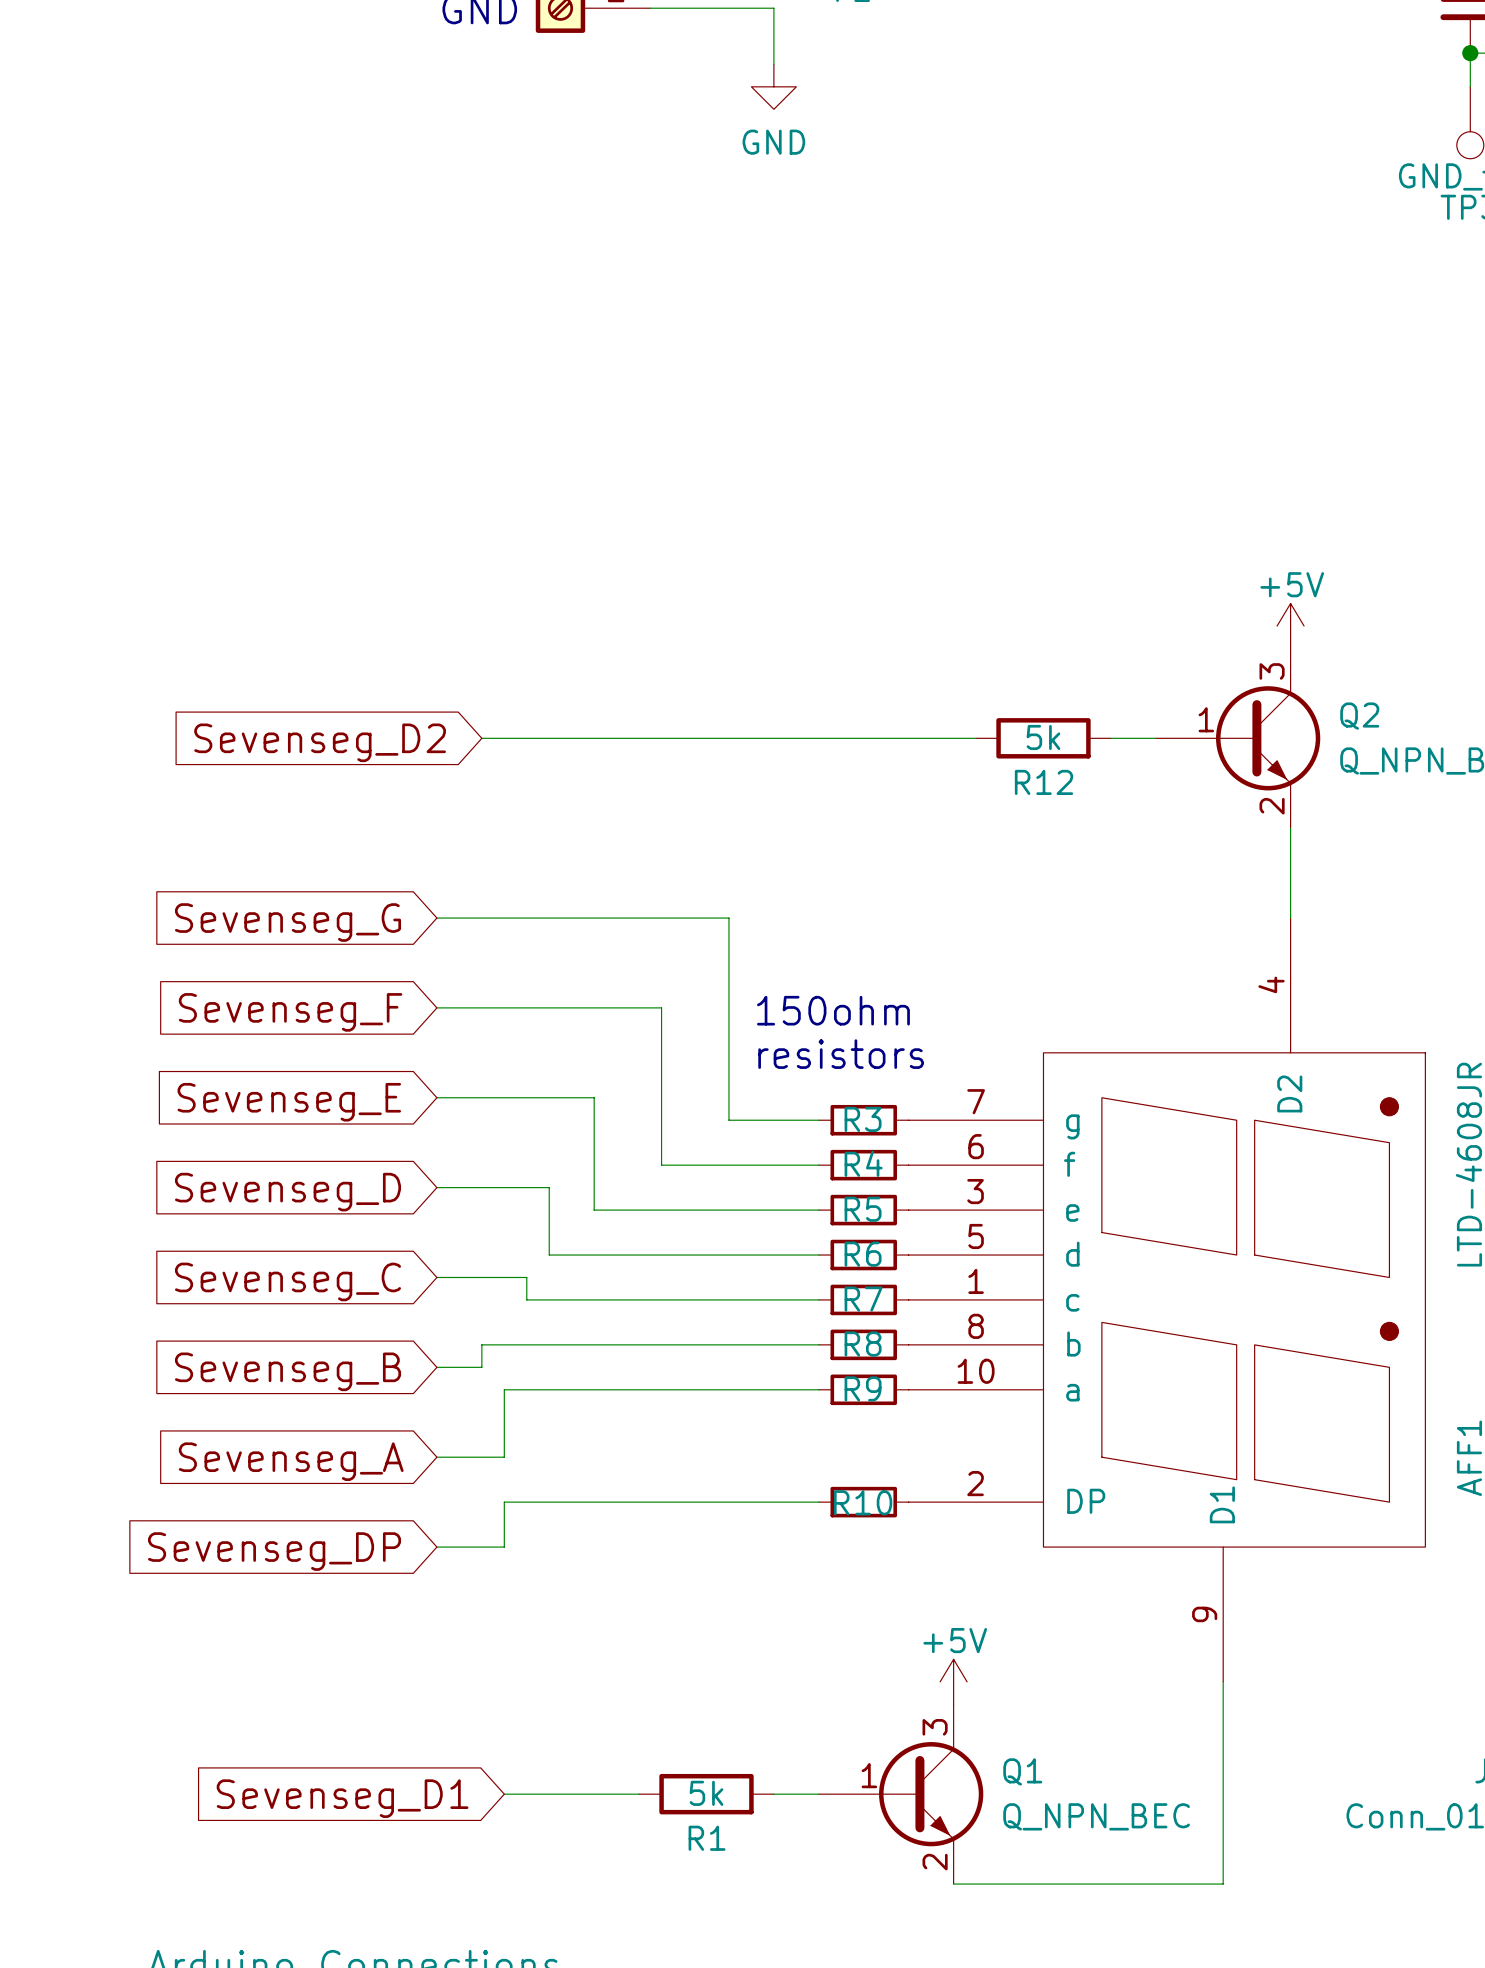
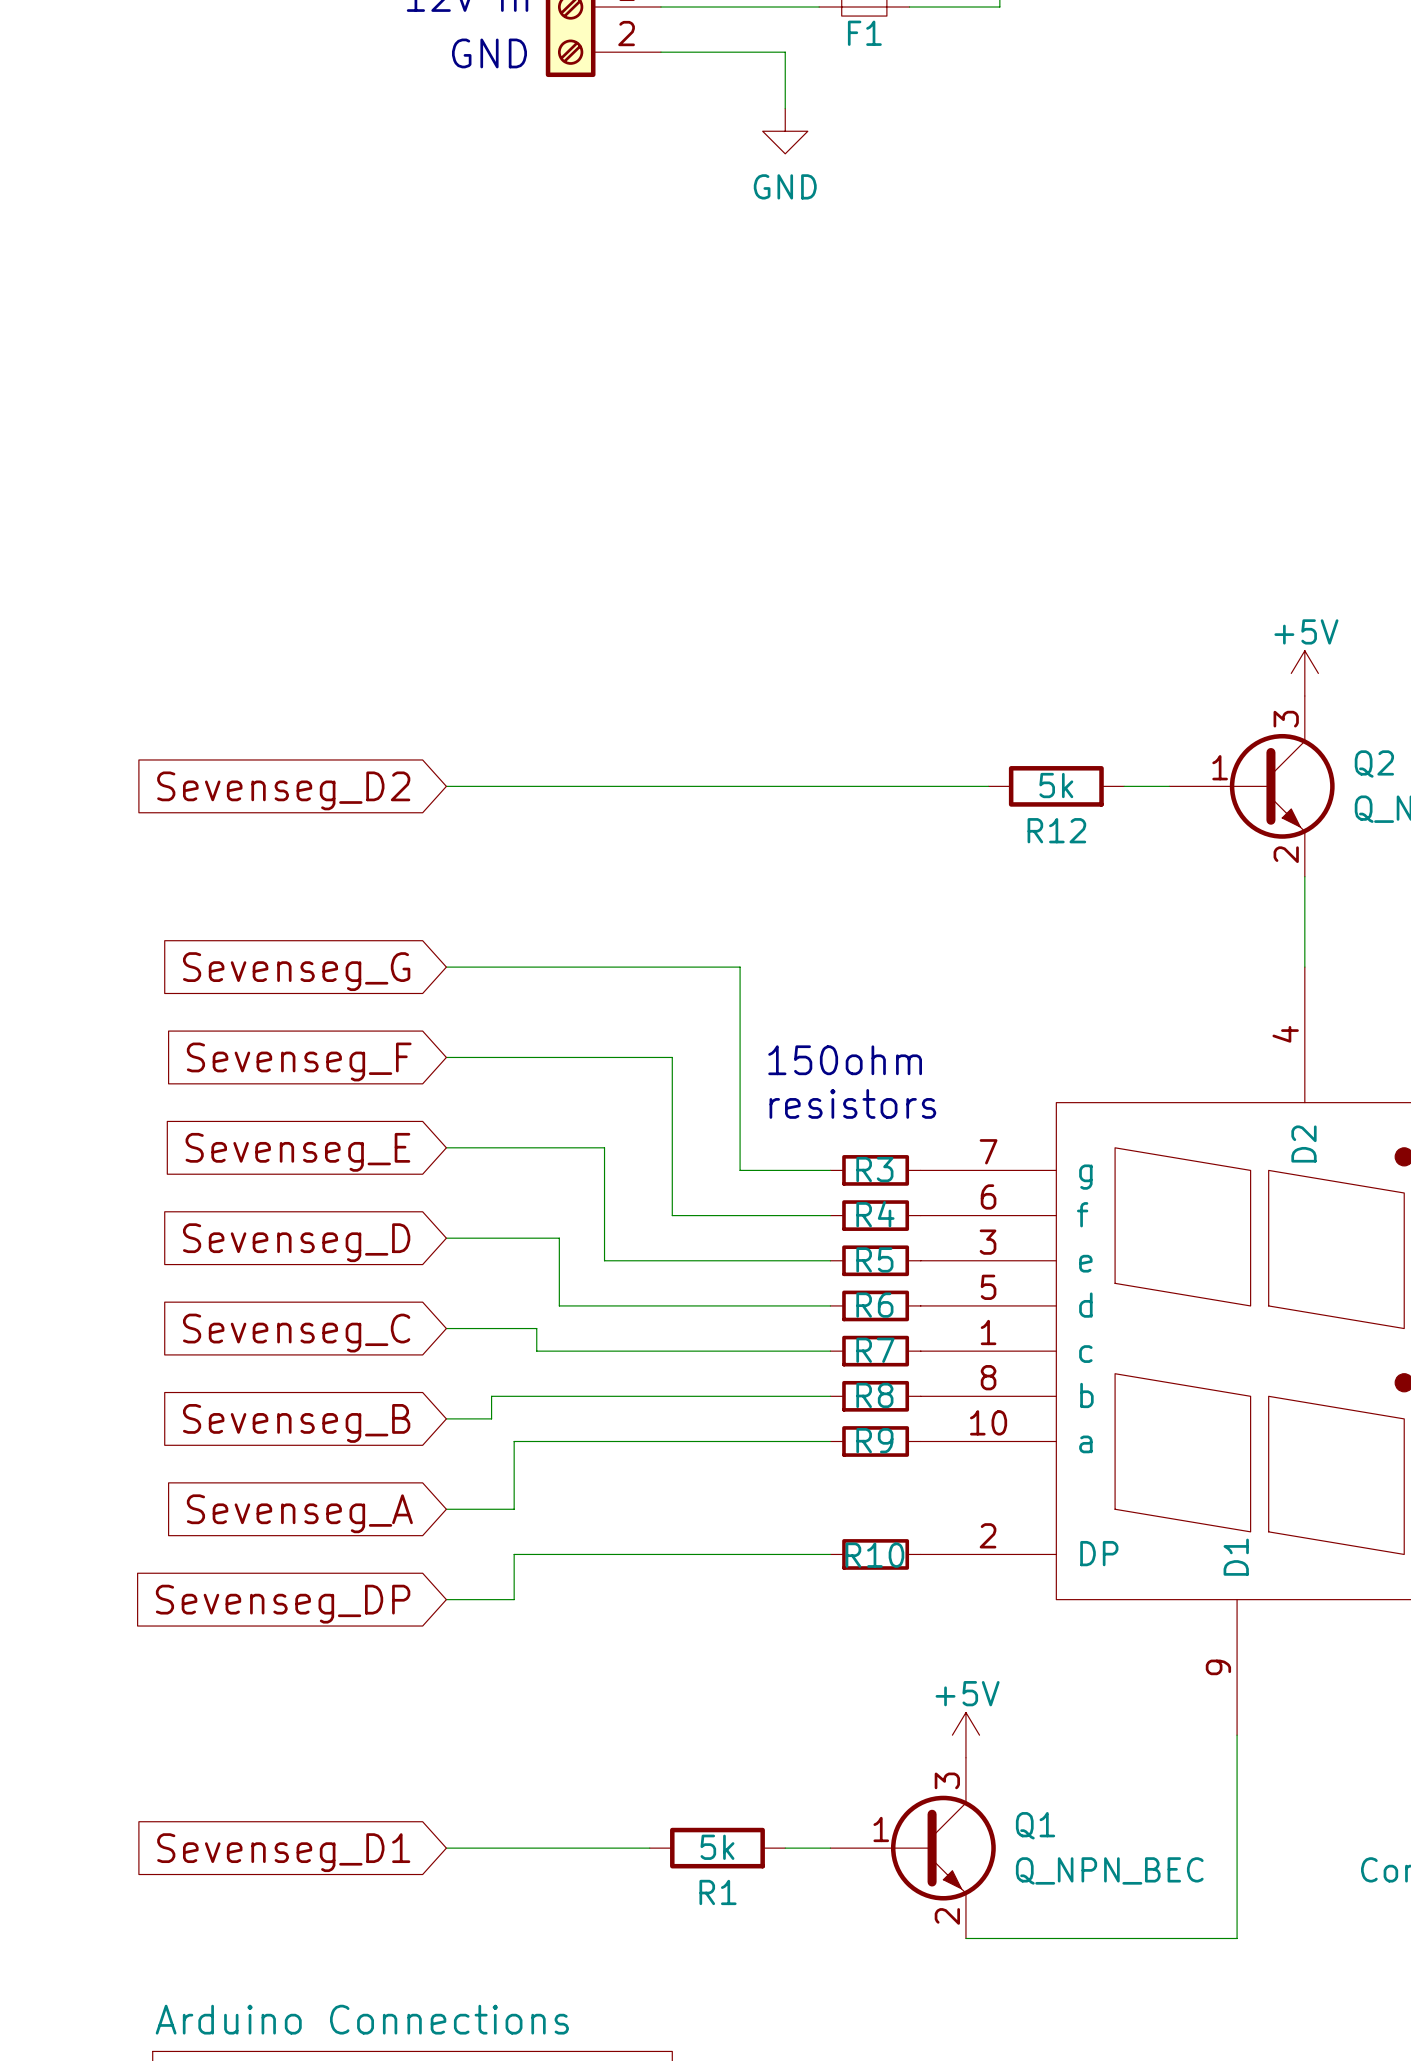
wire: none -> (446, 786) (491, 786)
global label position: Sevenseg_D2 (320, 742) -> Sevenseg_D2 (283, 790)
wire: none -> (446, 1848) (514, 1848)
global label position: Sevenseg_D1 (342, 1798) -> Sevenseg_D1 (283, 1852)

